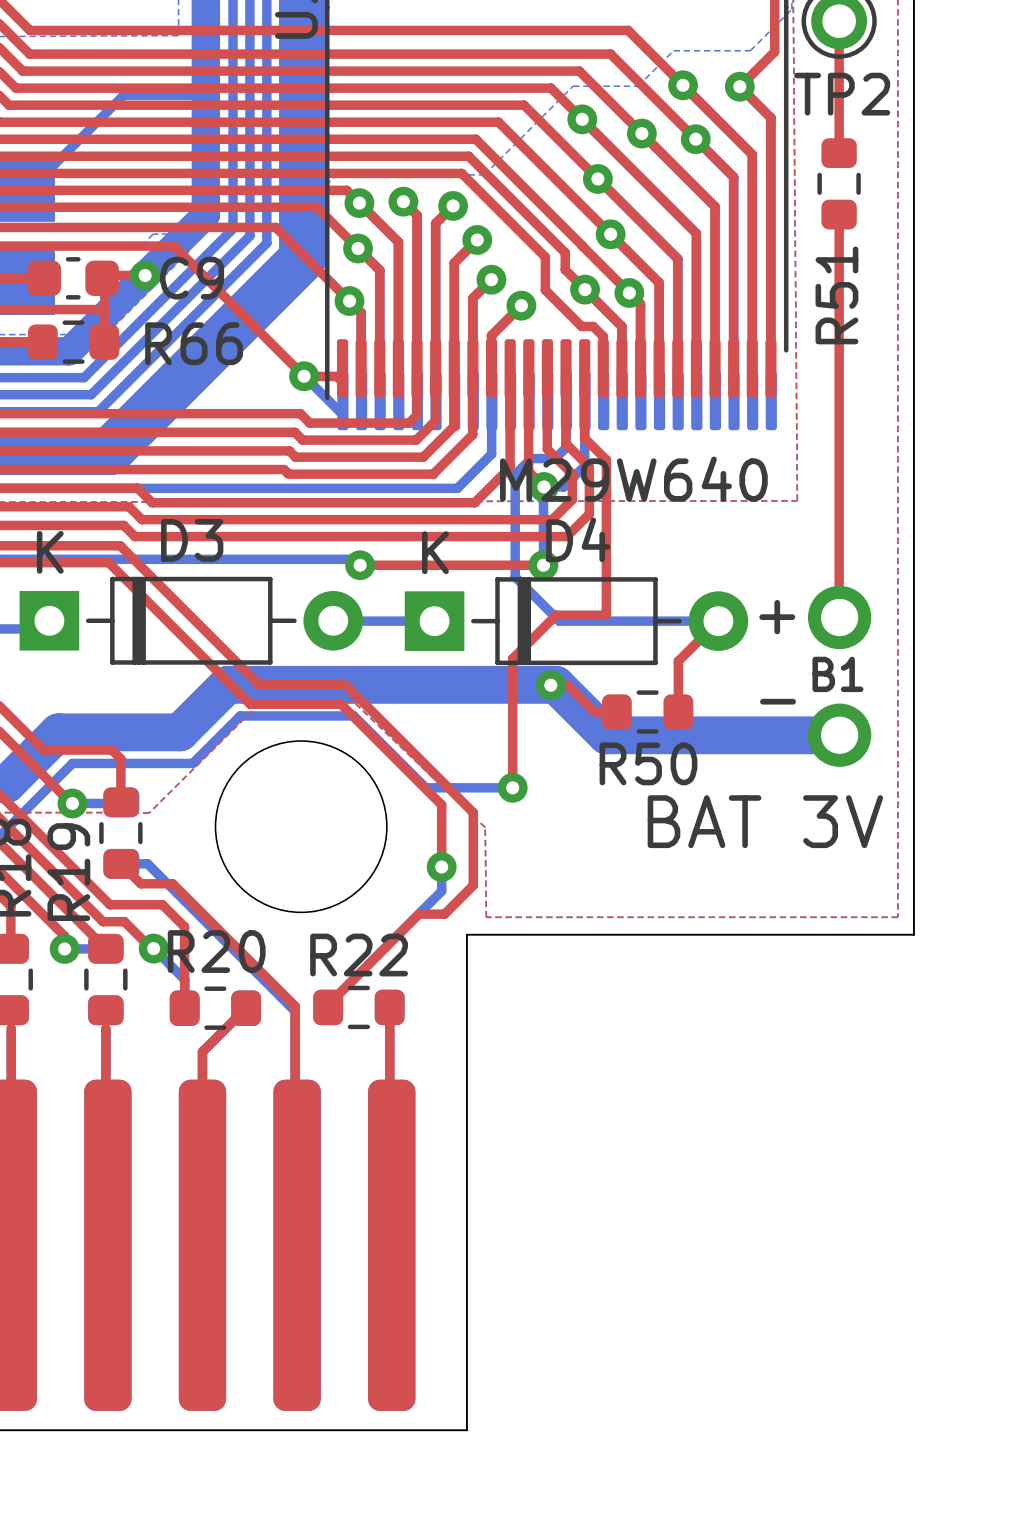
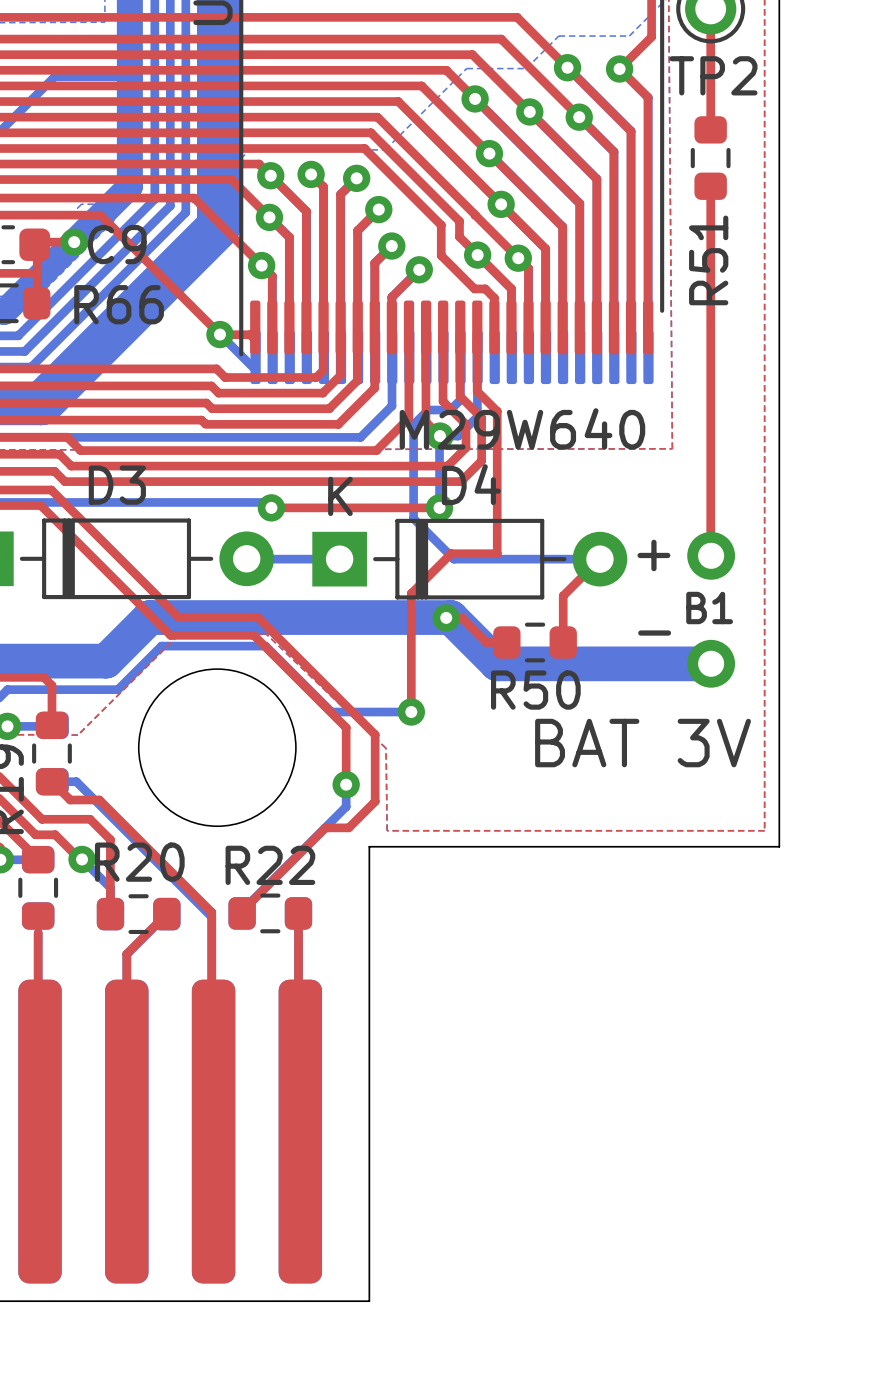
B1 footprint: [807, 585, 872, 767] -> [687, 531, 736, 688]

